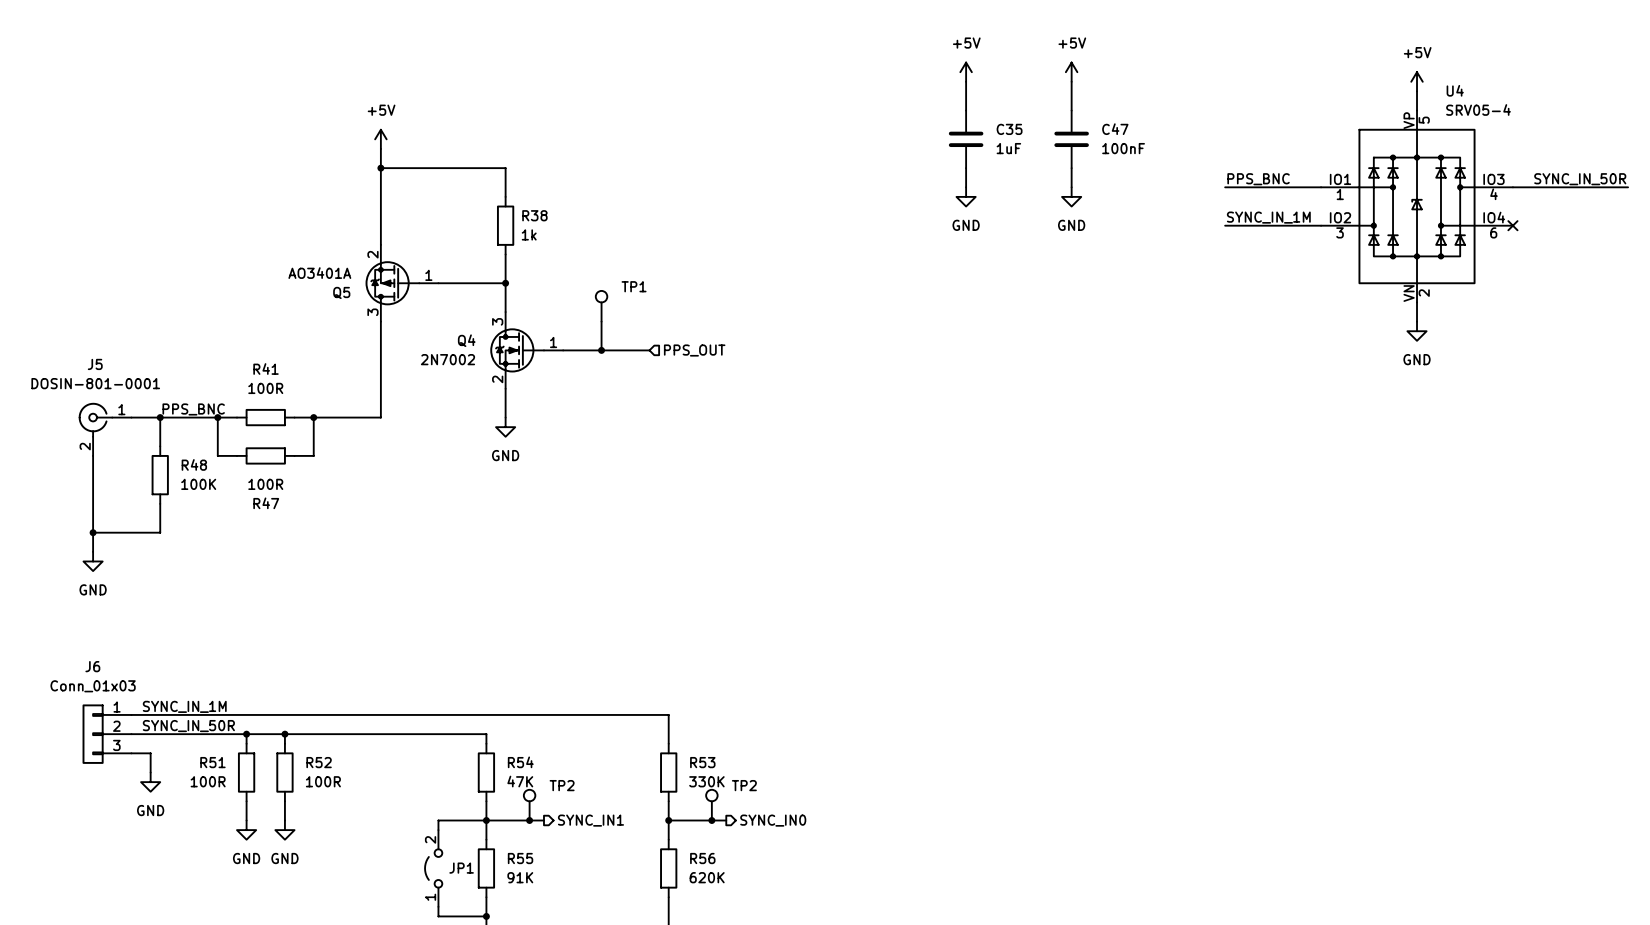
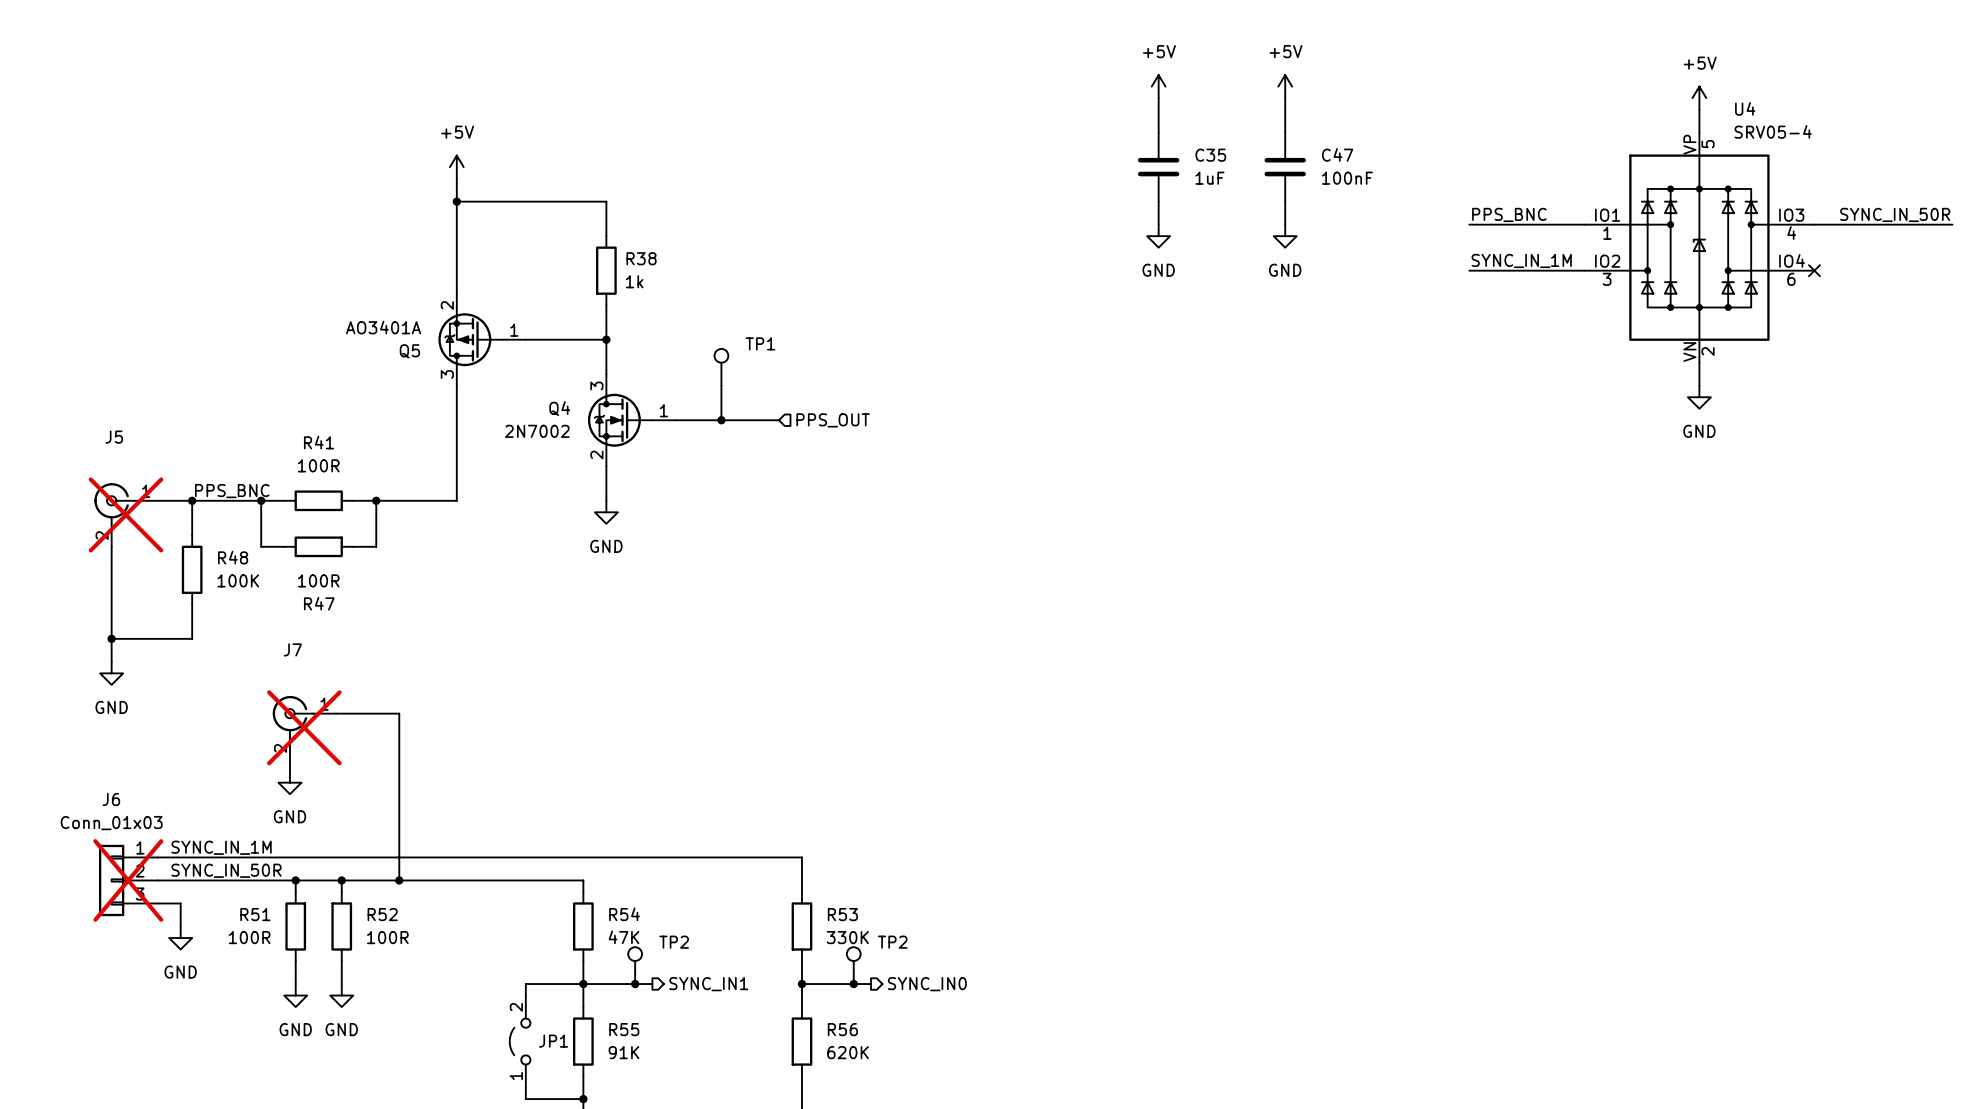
J5 value: DOSIN-801-0001 (95, 383) -> none
J5 do-not-place cross: none -> (126, 514)
wire: none -> (336, 713) (399, 713) (399, 880)
J7: none -> (304, 727)
wire: none -> (289, 759) (289, 771)
power symbol: none -> GND (289, 782)
J6 do-not-place cross: none -> (128, 880)
junction: none -> (399, 880)

